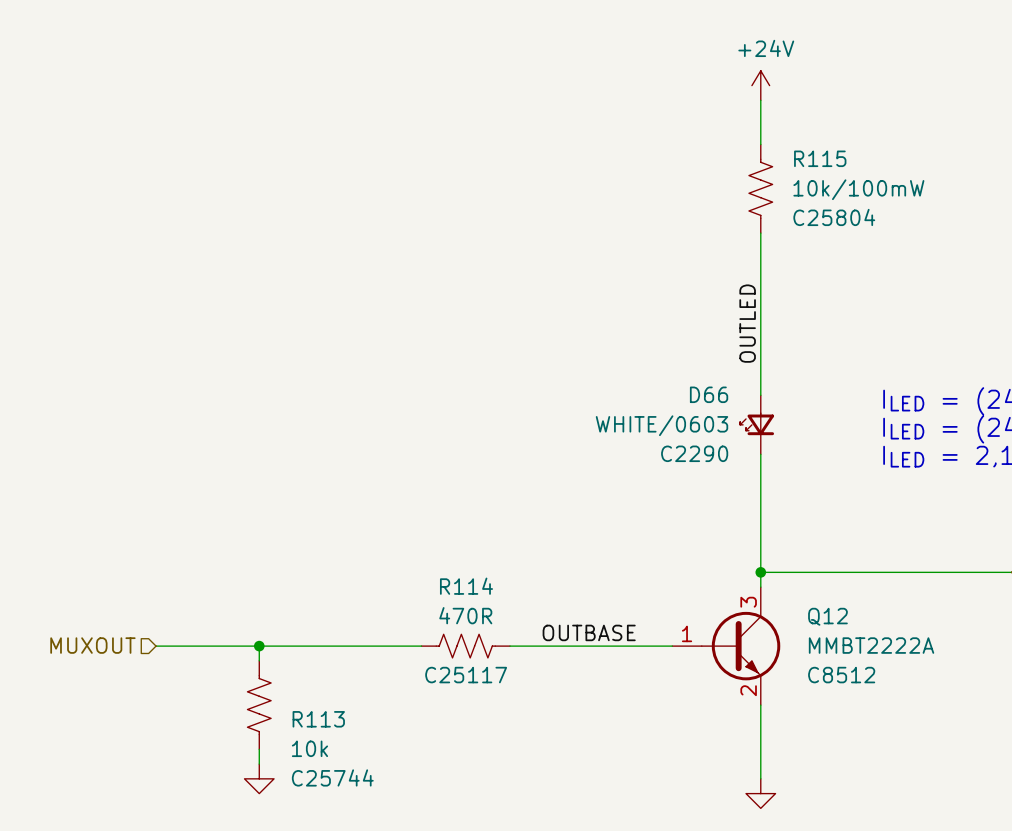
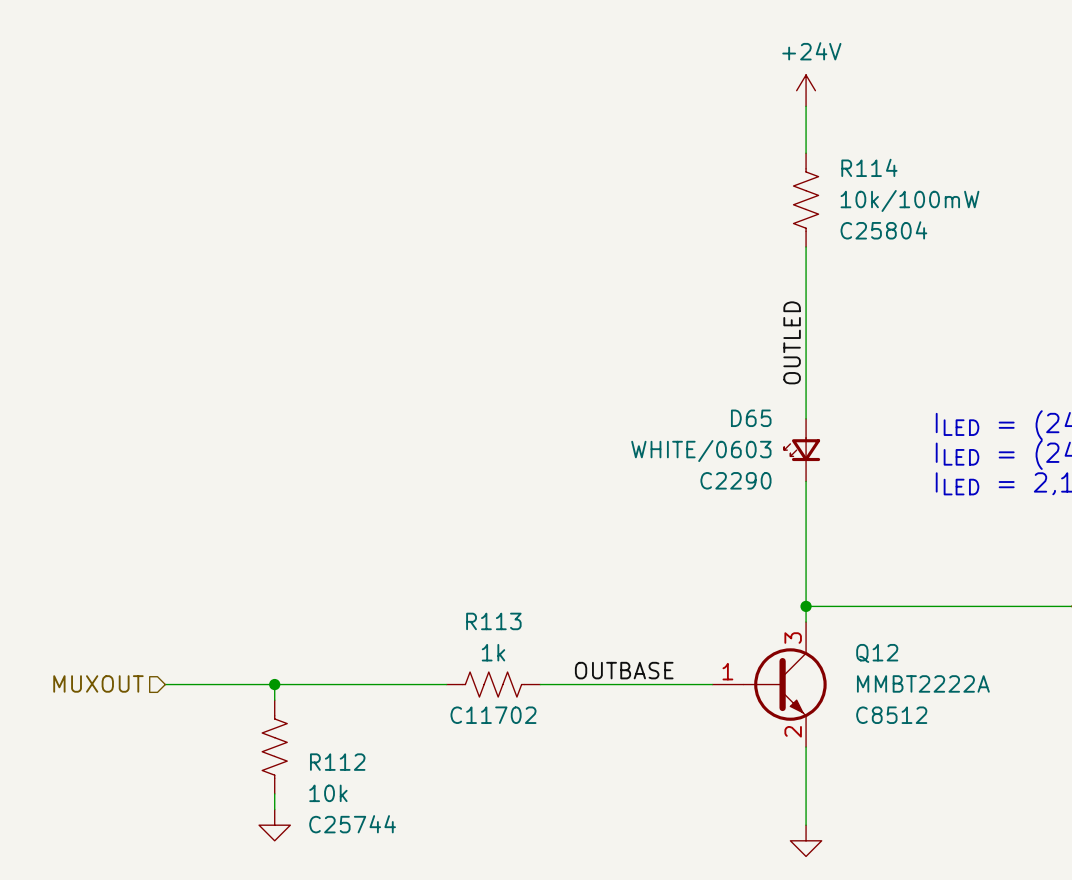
R115 name: R115 (820, 158) -> R114 (869, 167)
D66 name: D66 (709, 394) -> D65 (751, 418)
R114 name: R114 (466, 586) -> R113 (493, 621)
R114 value: 470R (465, 615) -> 1k (493, 652)
R114 text: C25117 (466, 675) -> C11702 (493, 715)
R113 name: R113 (318, 719) -> R112 (337, 762)

